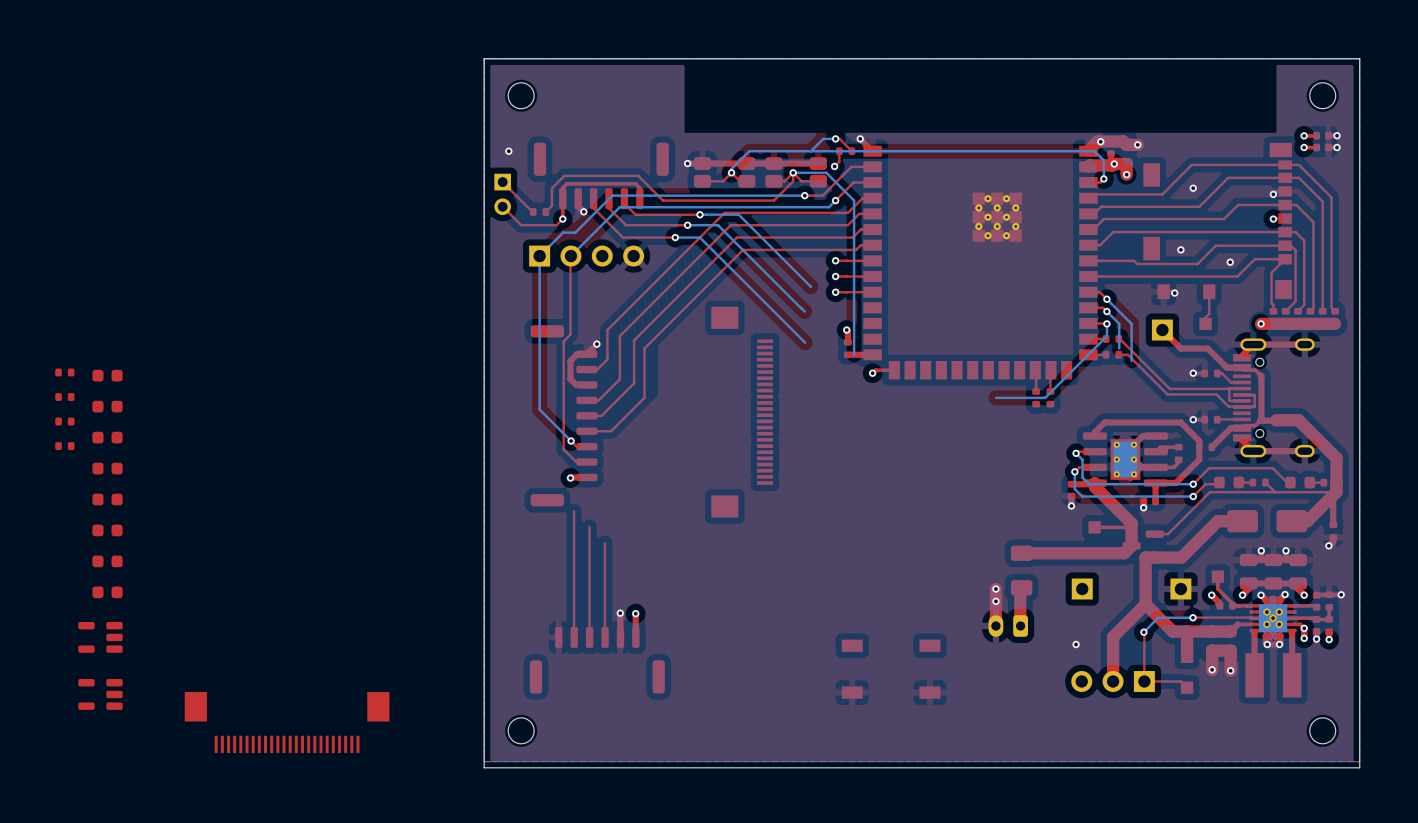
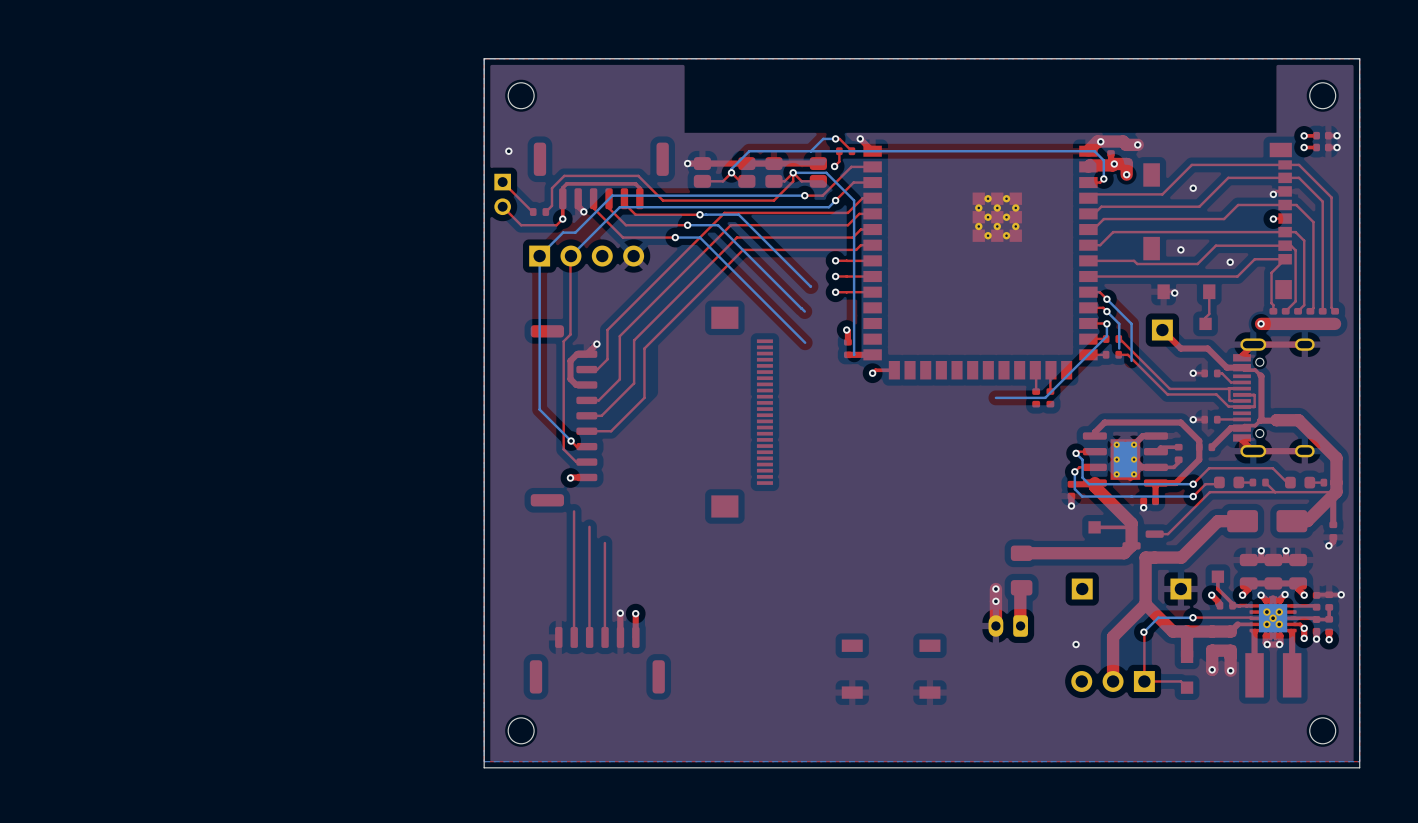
part: (64, 372) -> none
part: (107, 375) -> none
part: (64, 397) -> none
part: (107, 406) -> none
part: (64, 421) -> none
part: (107, 437) -> none
part: (64, 446) -> none
part: (107, 468) -> none
part: (107, 499) -> none
part: (107, 530) -> none
part: (107, 561) -> none
part: (107, 592) -> none
part: (100, 637) -> none
part: (100, 694) -> none
part: (287, 722) -> none

